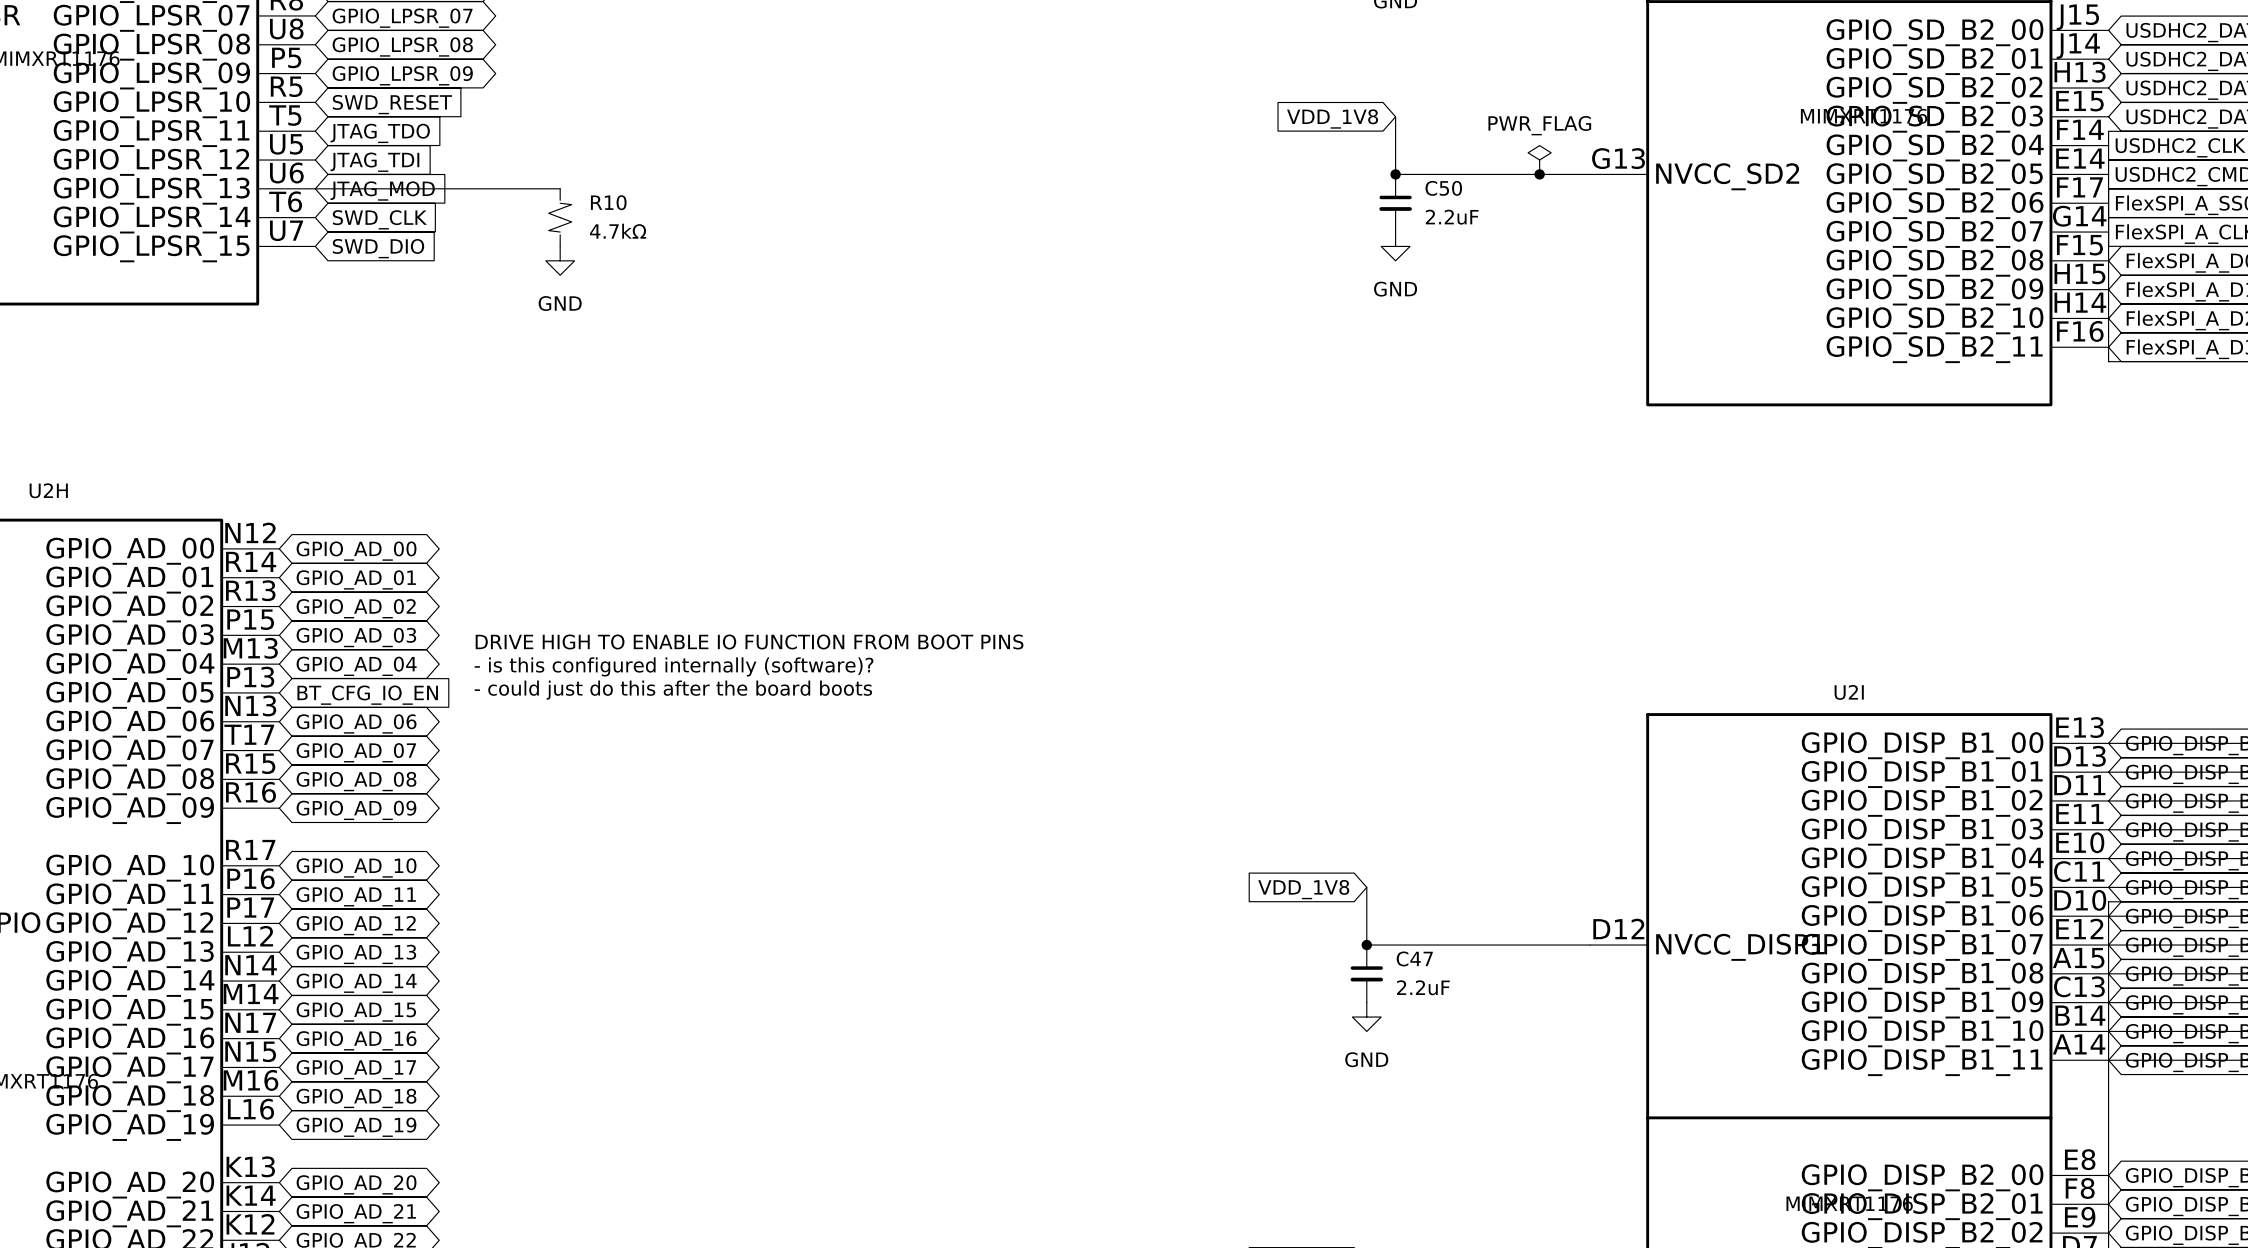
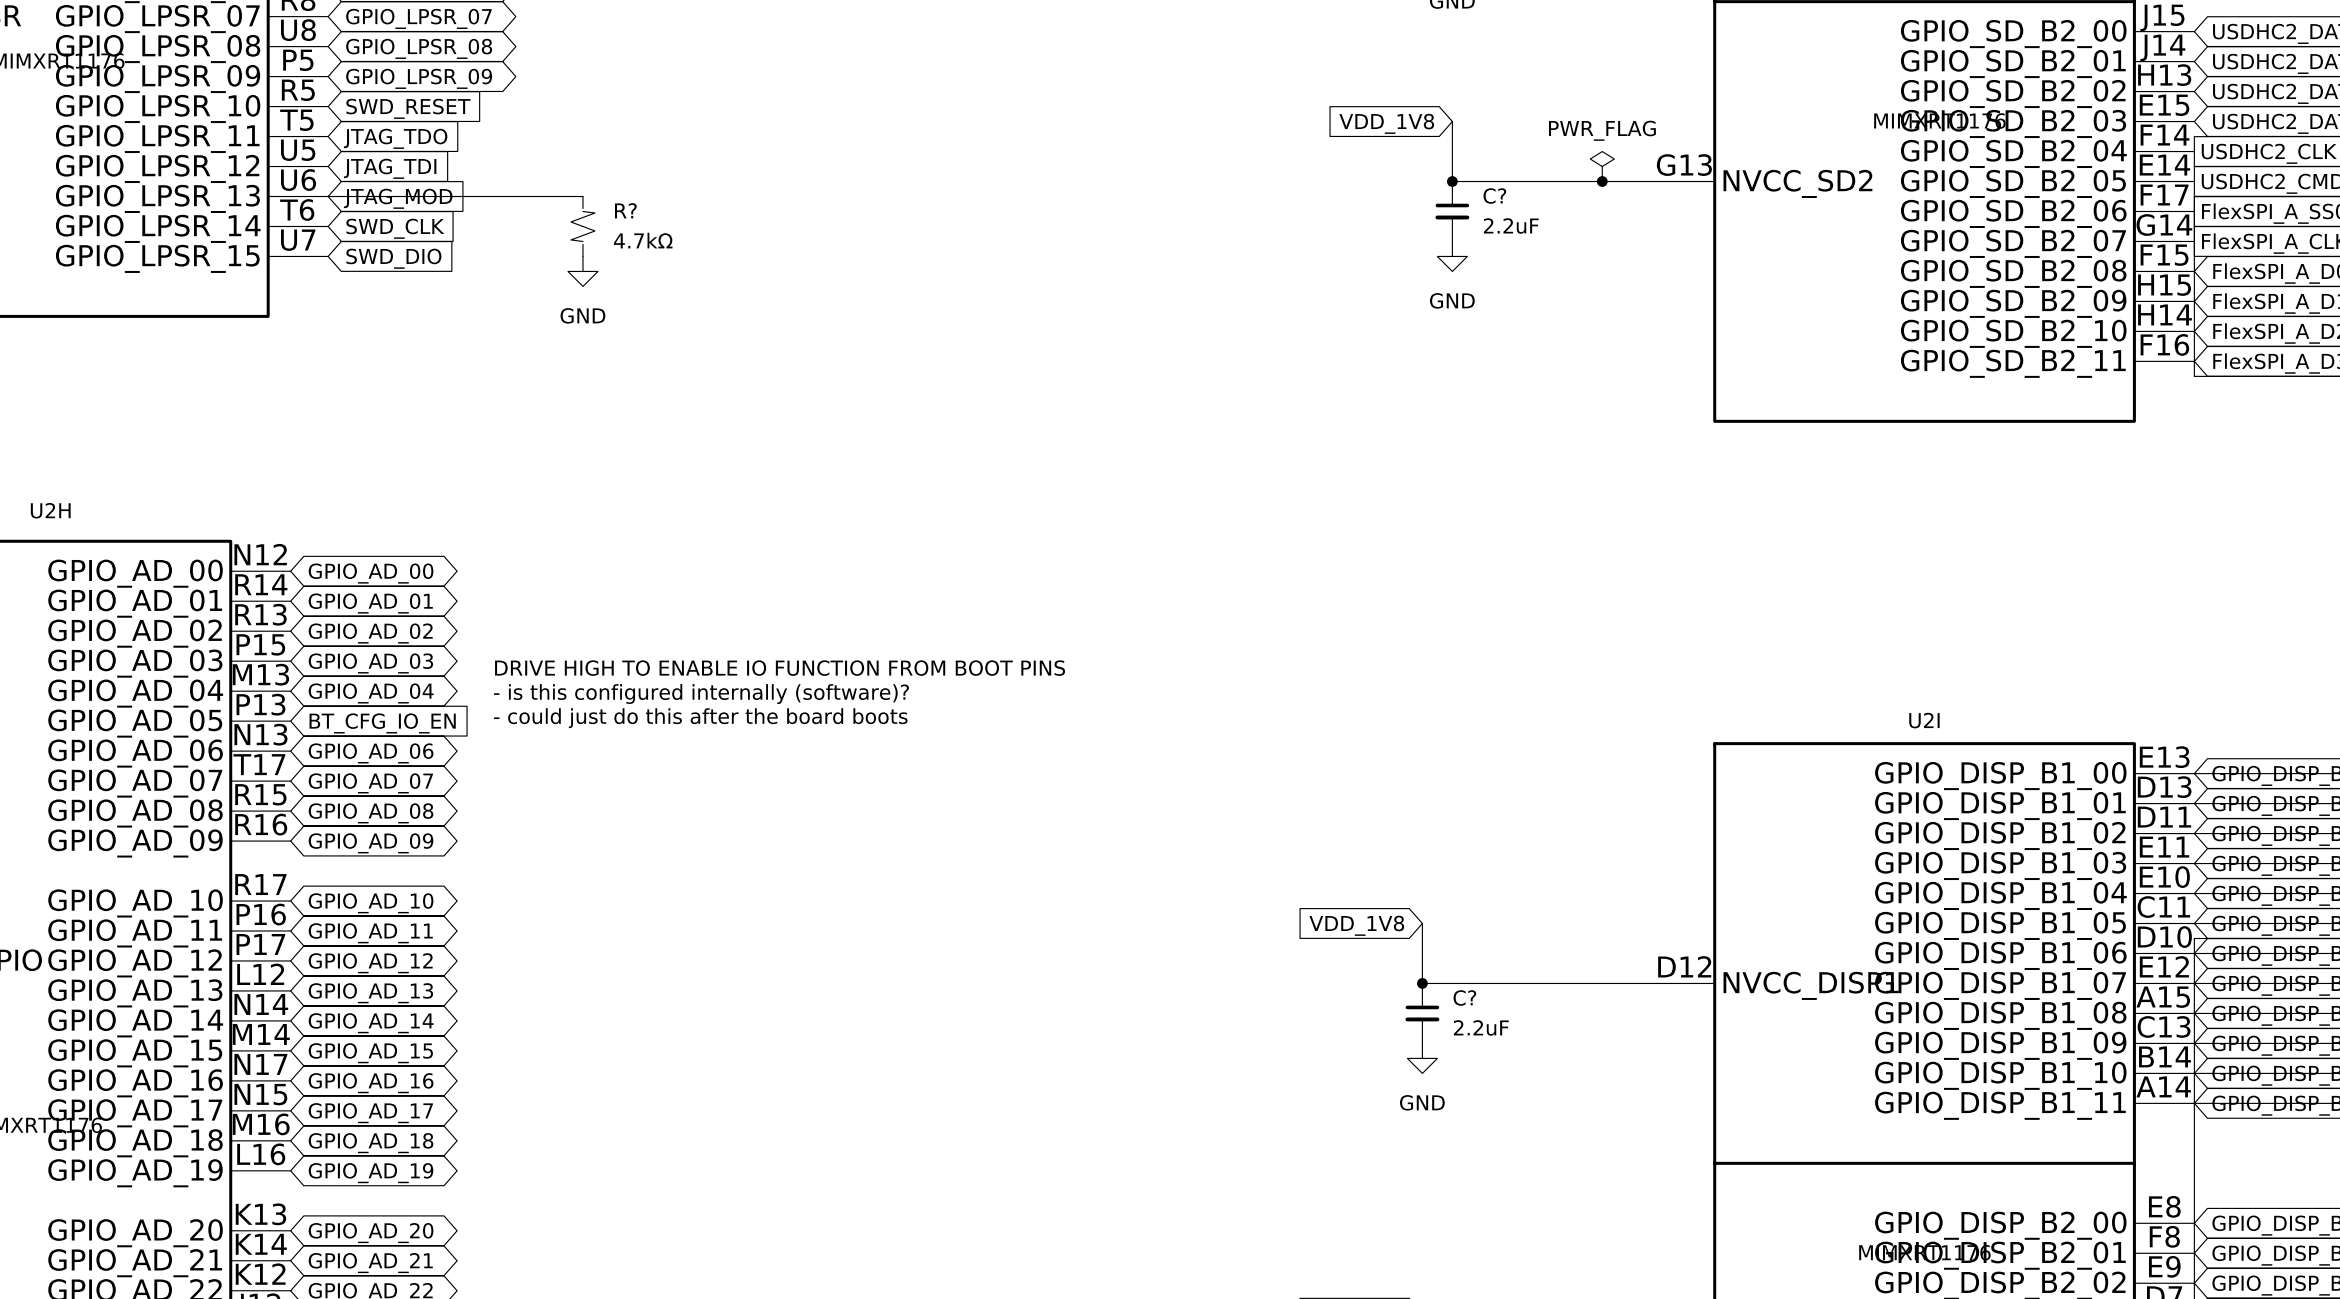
C50 name: C50 (1443, 188) -> C? (1494, 196)
R10 name: R10 (608, 202) -> R? (625, 210)
C47 name: C47 (1414, 958) -> C? (1464, 997)

